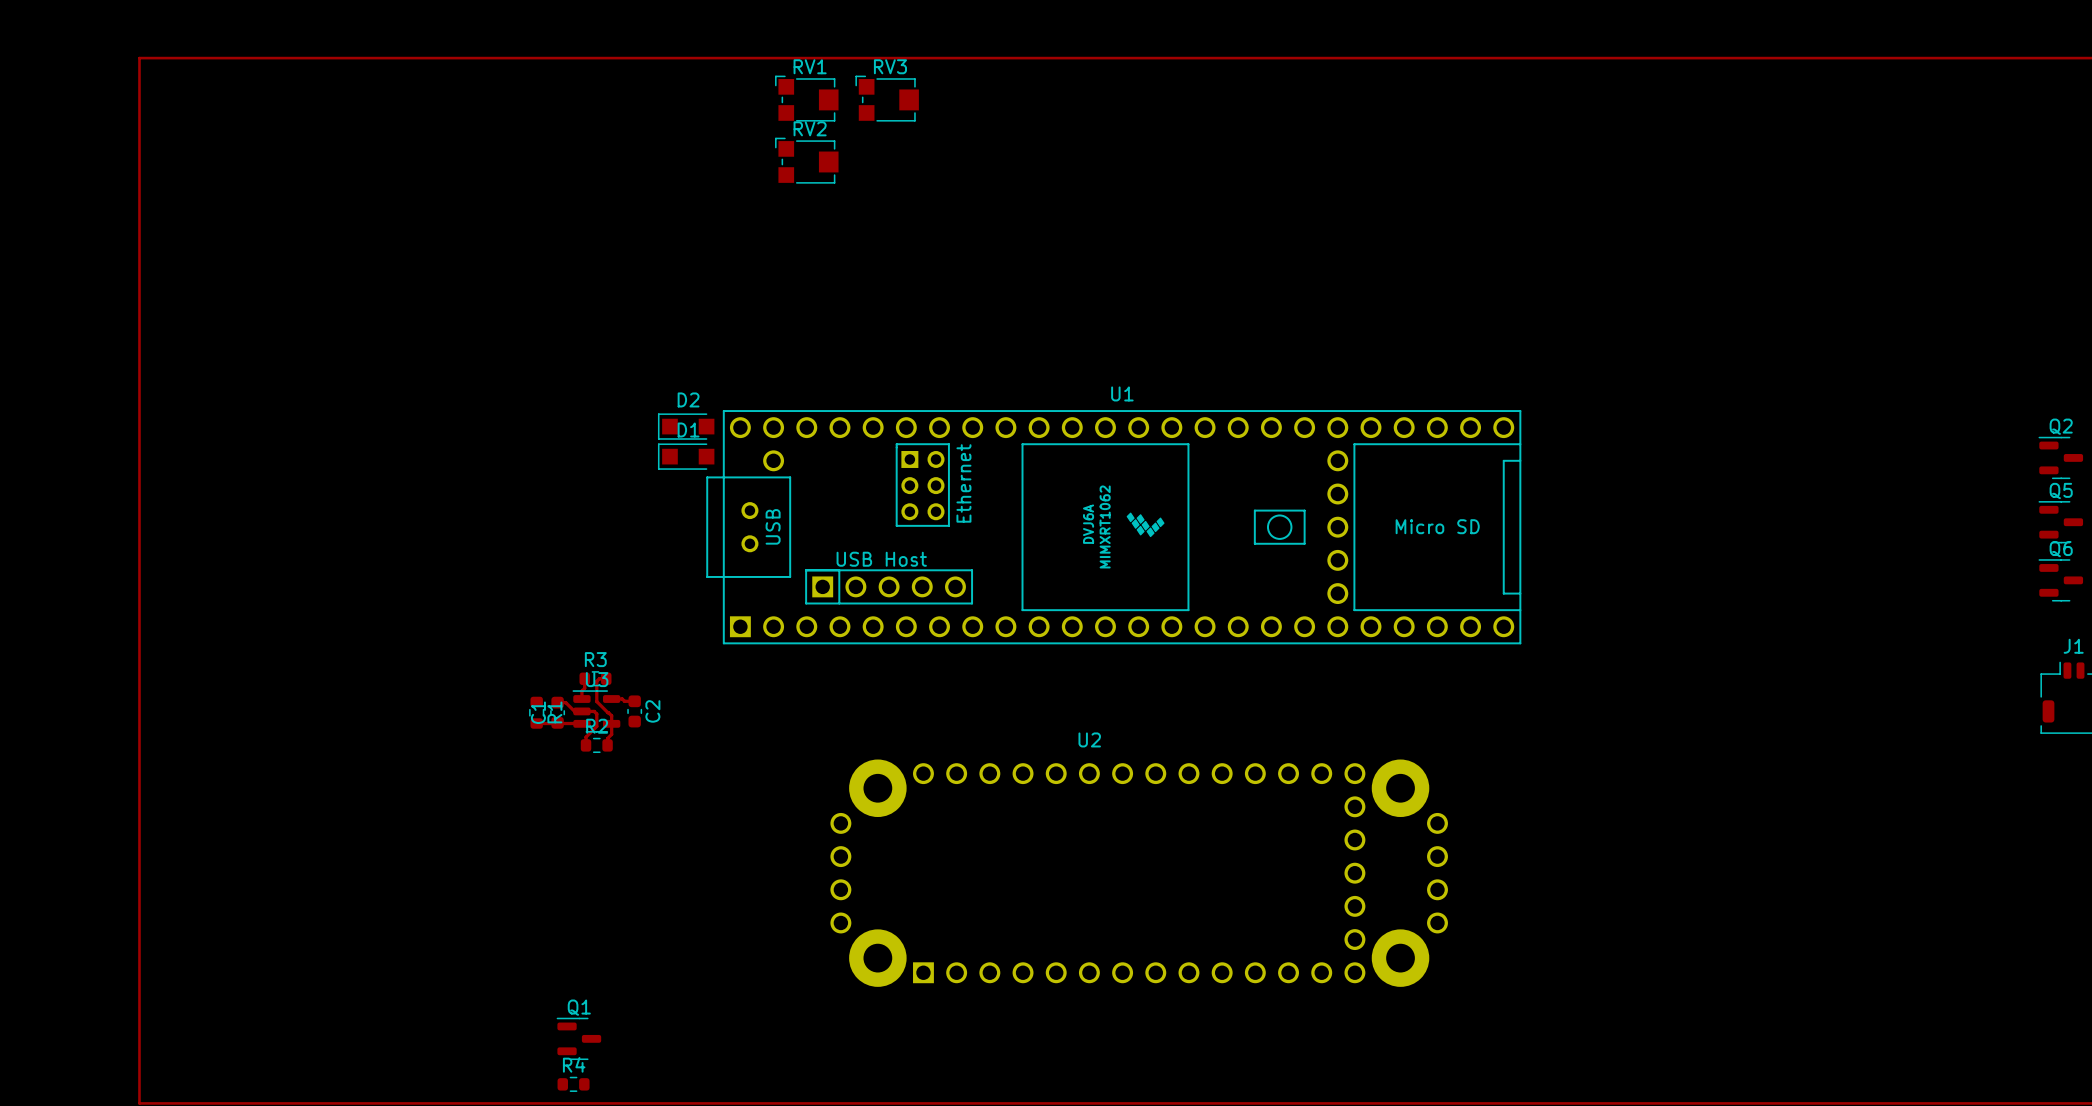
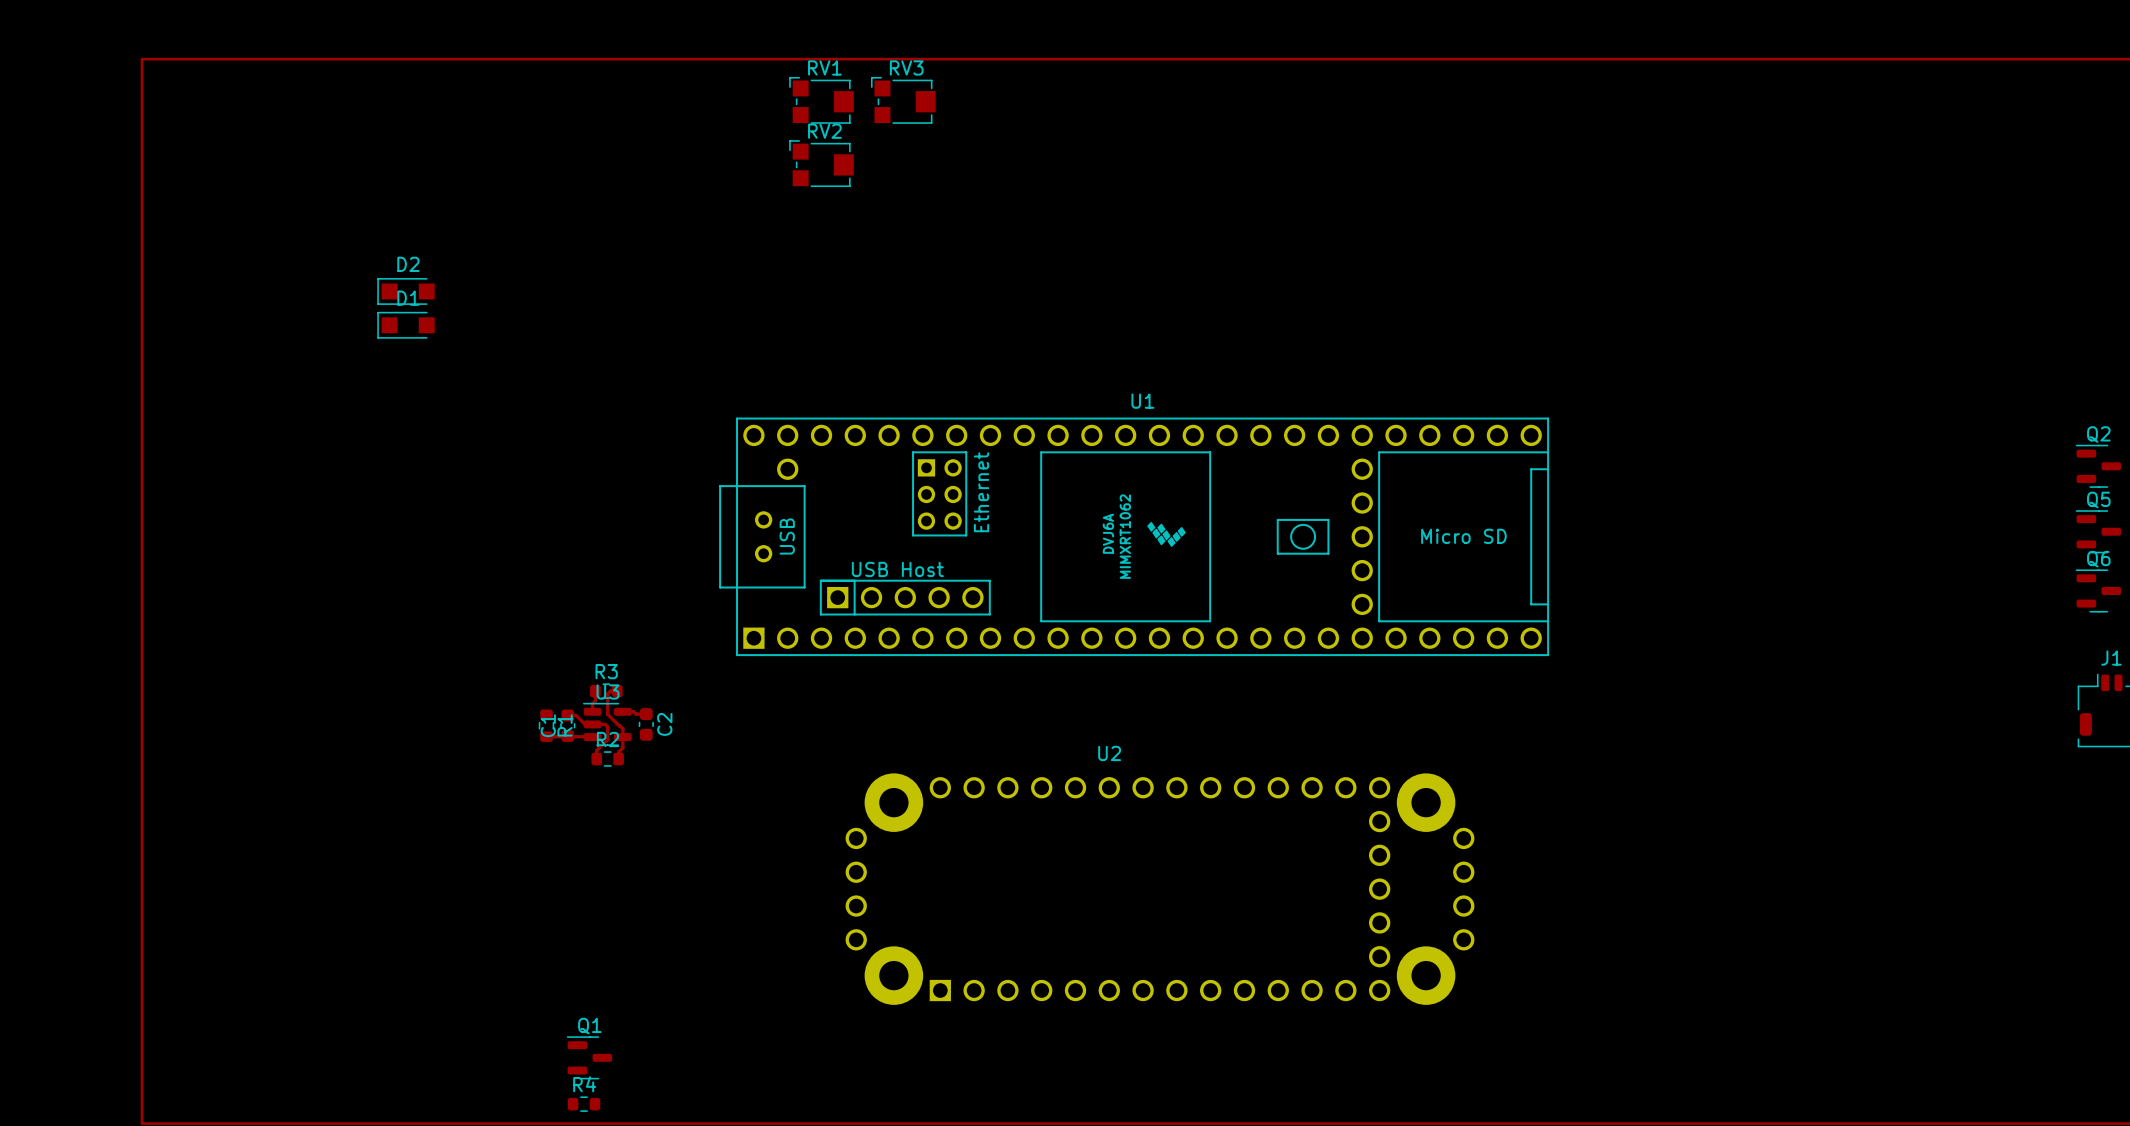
D2 position: (686, 426) -> (405, 291)
D1 position: (686, 456) -> (405, 325)

